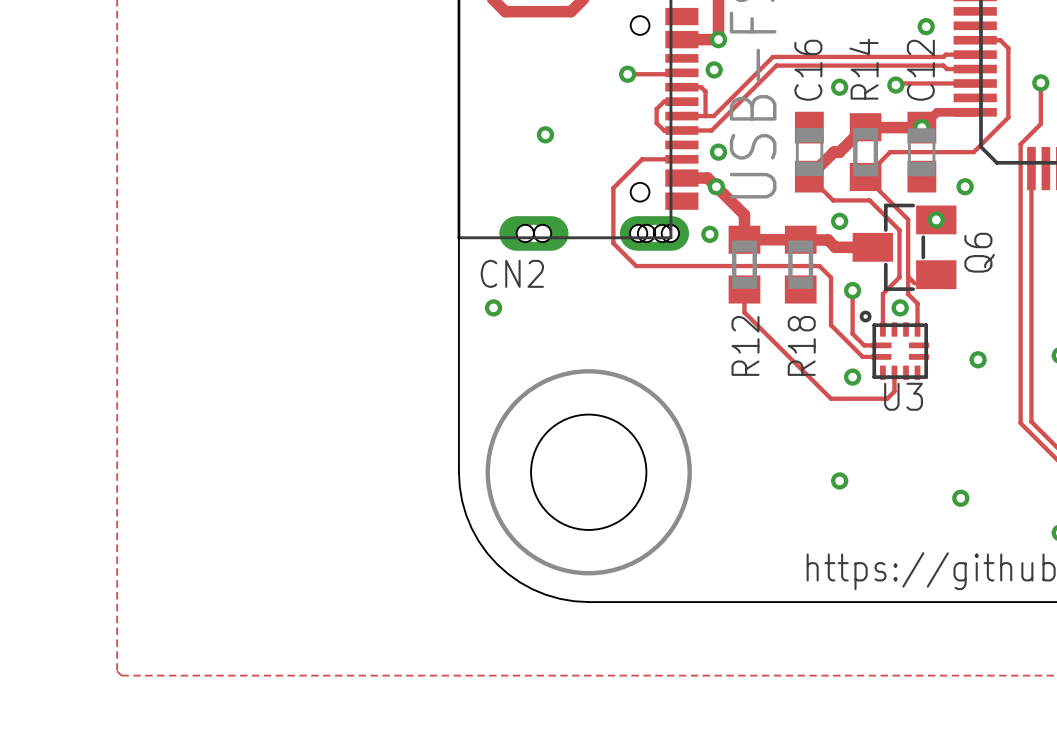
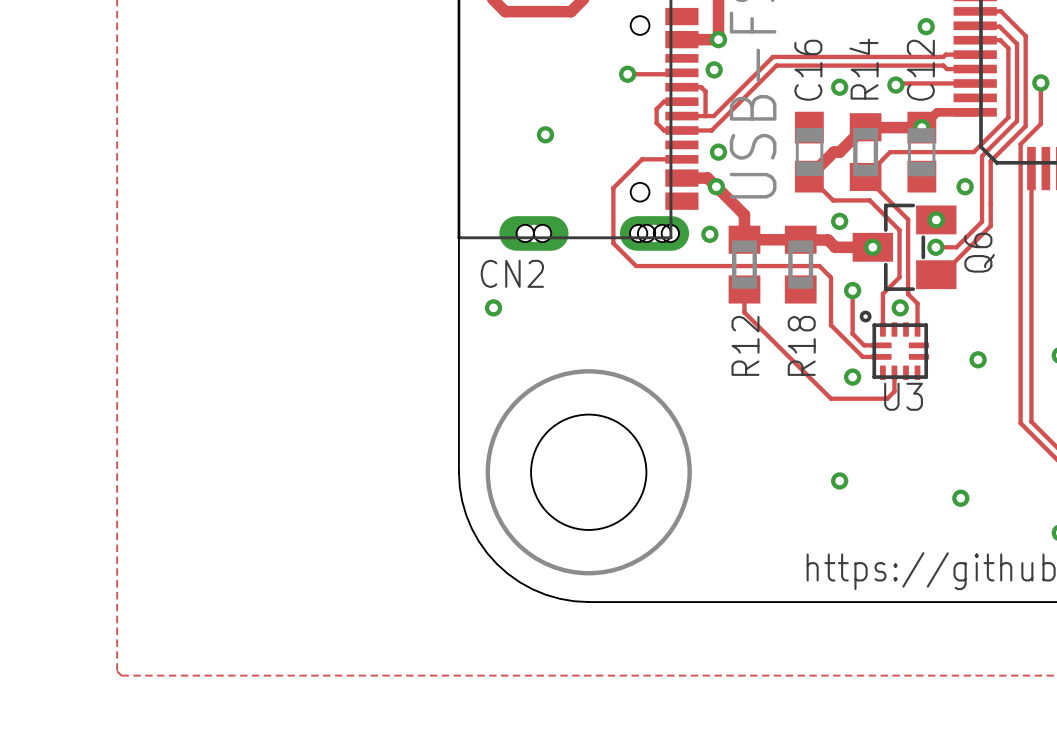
track: none -> (975, 11) (1001, 11) (1025, 36) (1025, 126) (990, 161) (990, 226) (942, 274) (936, 274)
track: none -> (975, 25) (999, 26) (1017, 43) (1017, 121) (982, 156) (982, 221) (956, 247) (935, 247)
via: none -> (872, 247)
via: none -> (935, 247)
track: (908, 276) (914, 283) -> none

